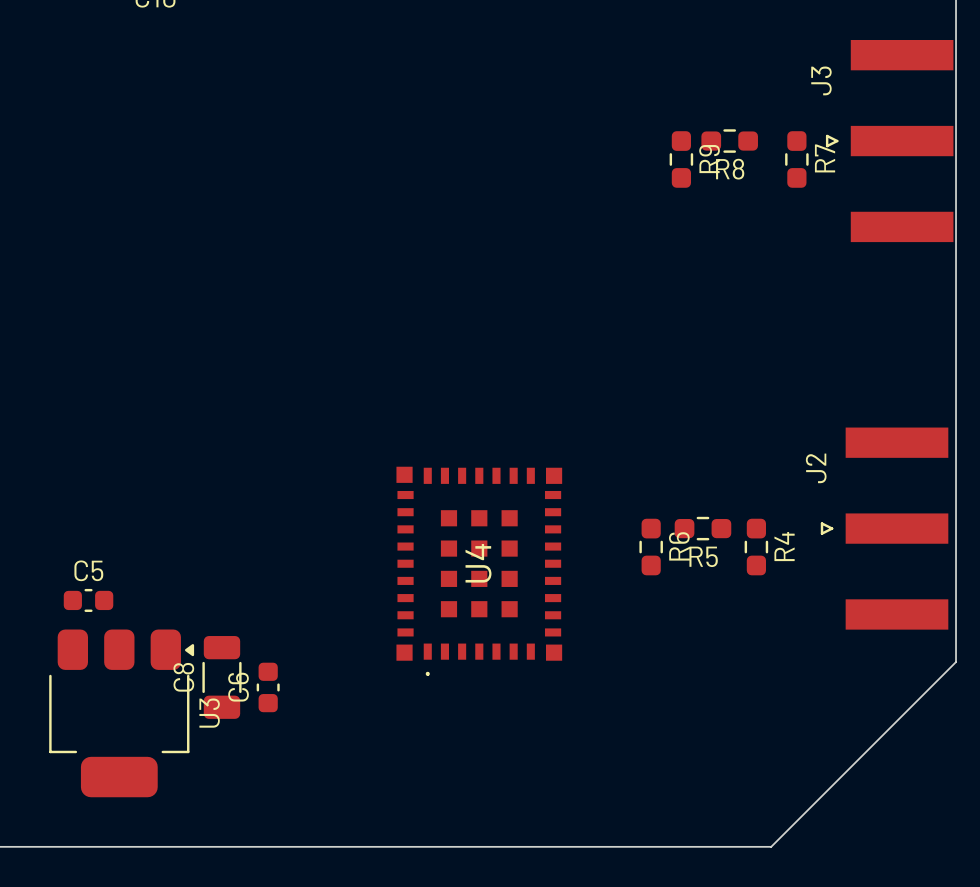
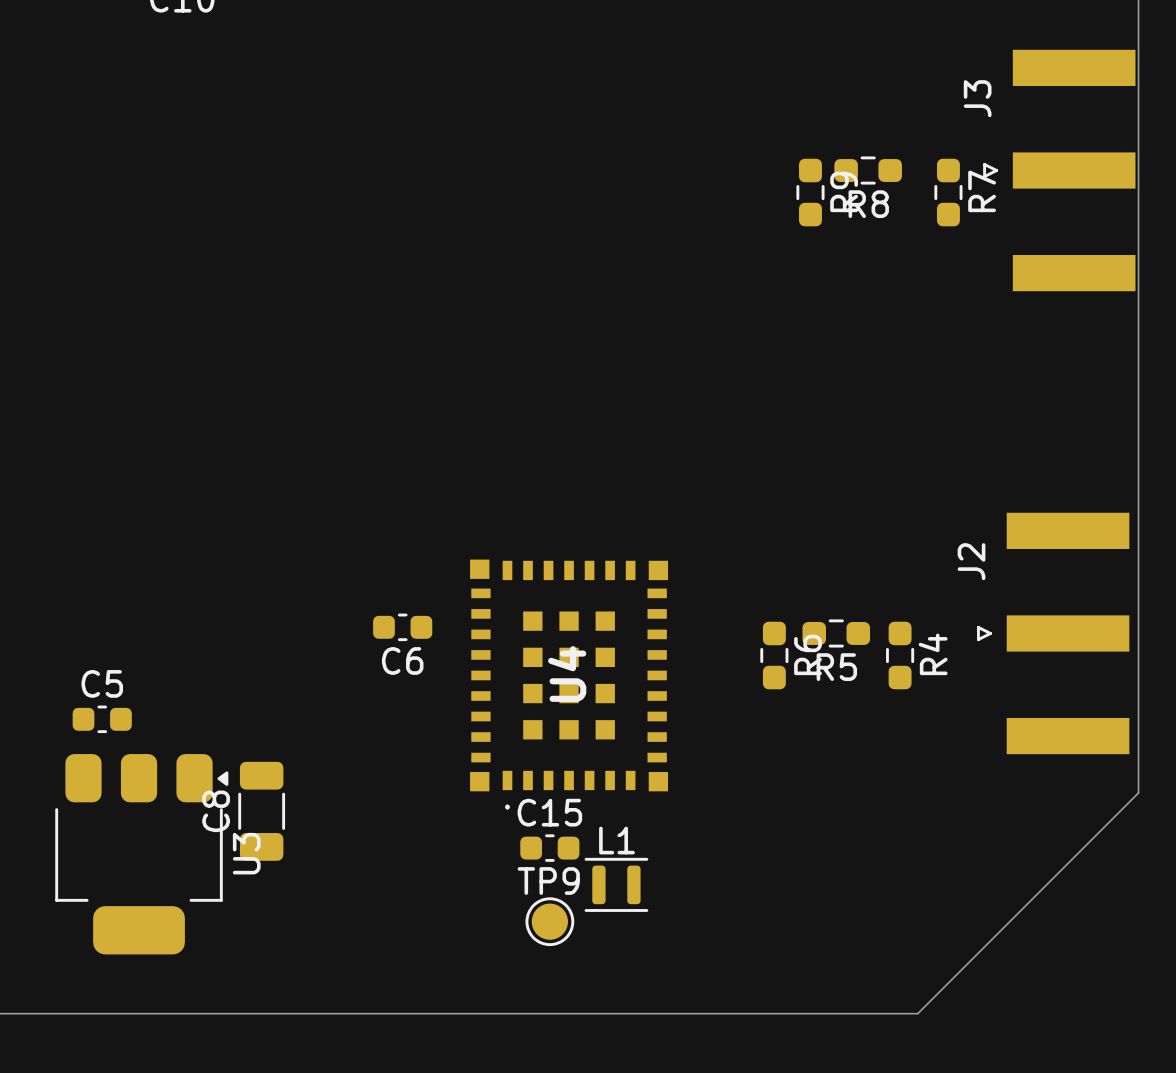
C6 name position: C6 (238, 687) -> C6 (402, 660)
C6 rotation: 0° (268, 687) -> 90° clockwise (402, 627)
C6 position: (268, 687) -> (402, 627)
C15: none -> (549, 848)
L1: none -> (616, 884)
TP9: none -> (549, 921)

